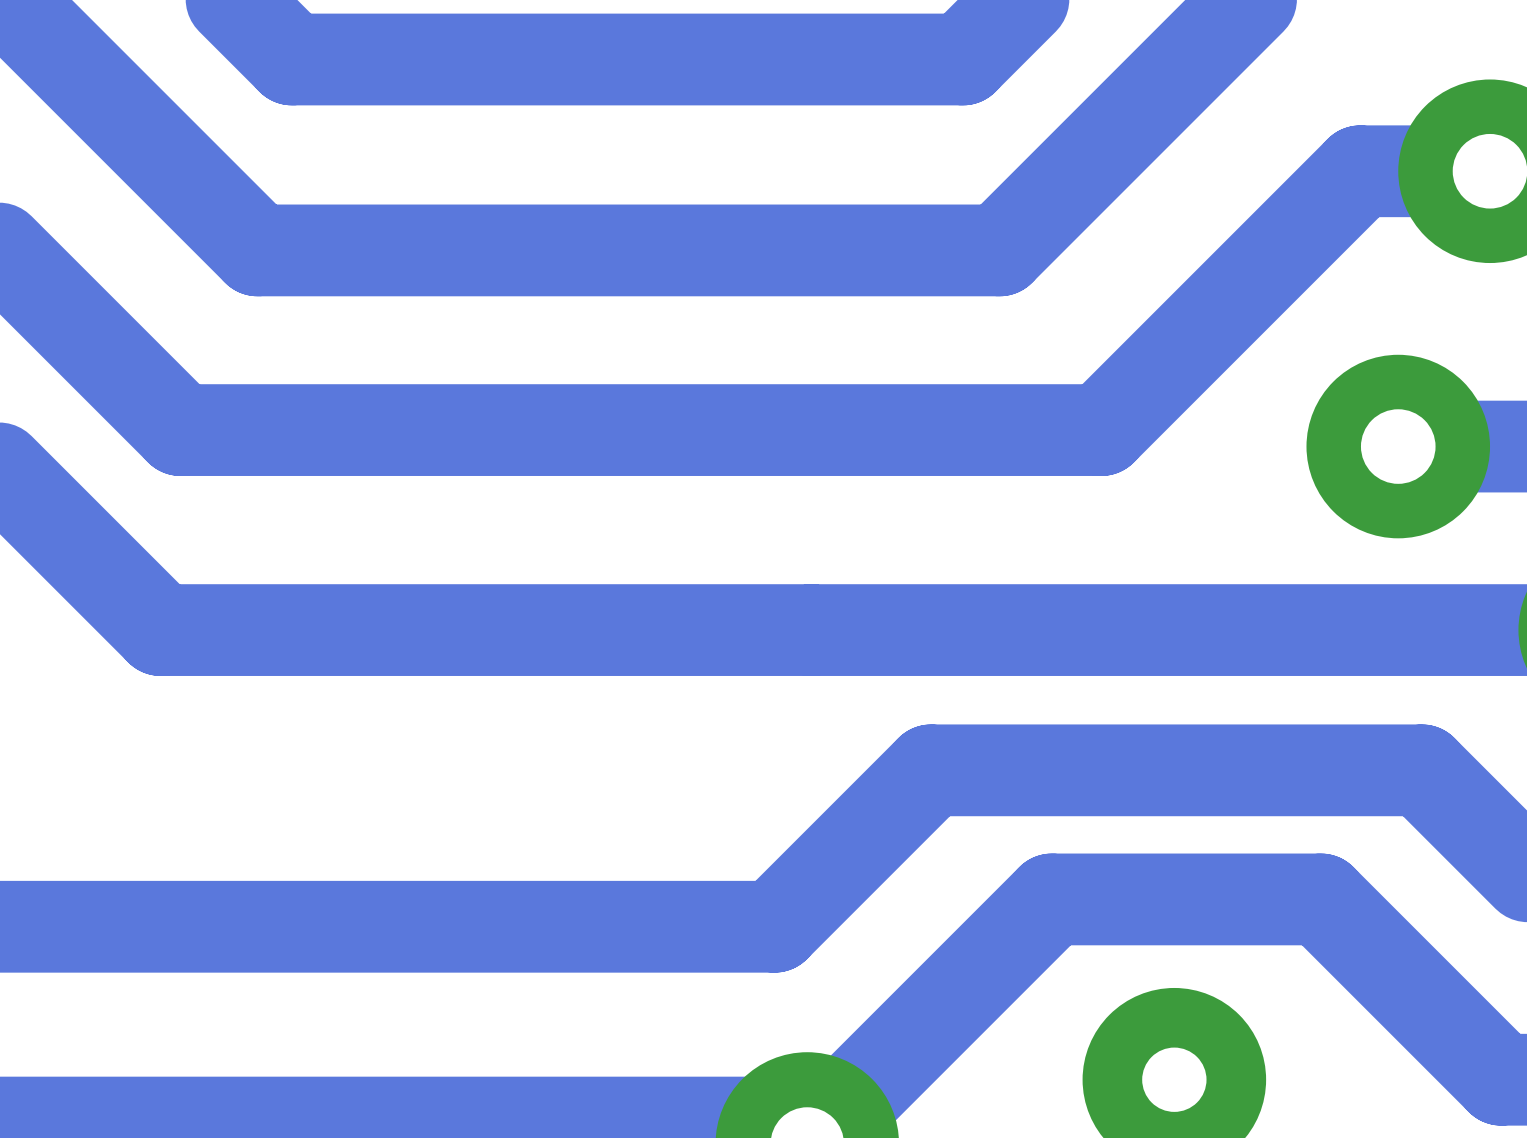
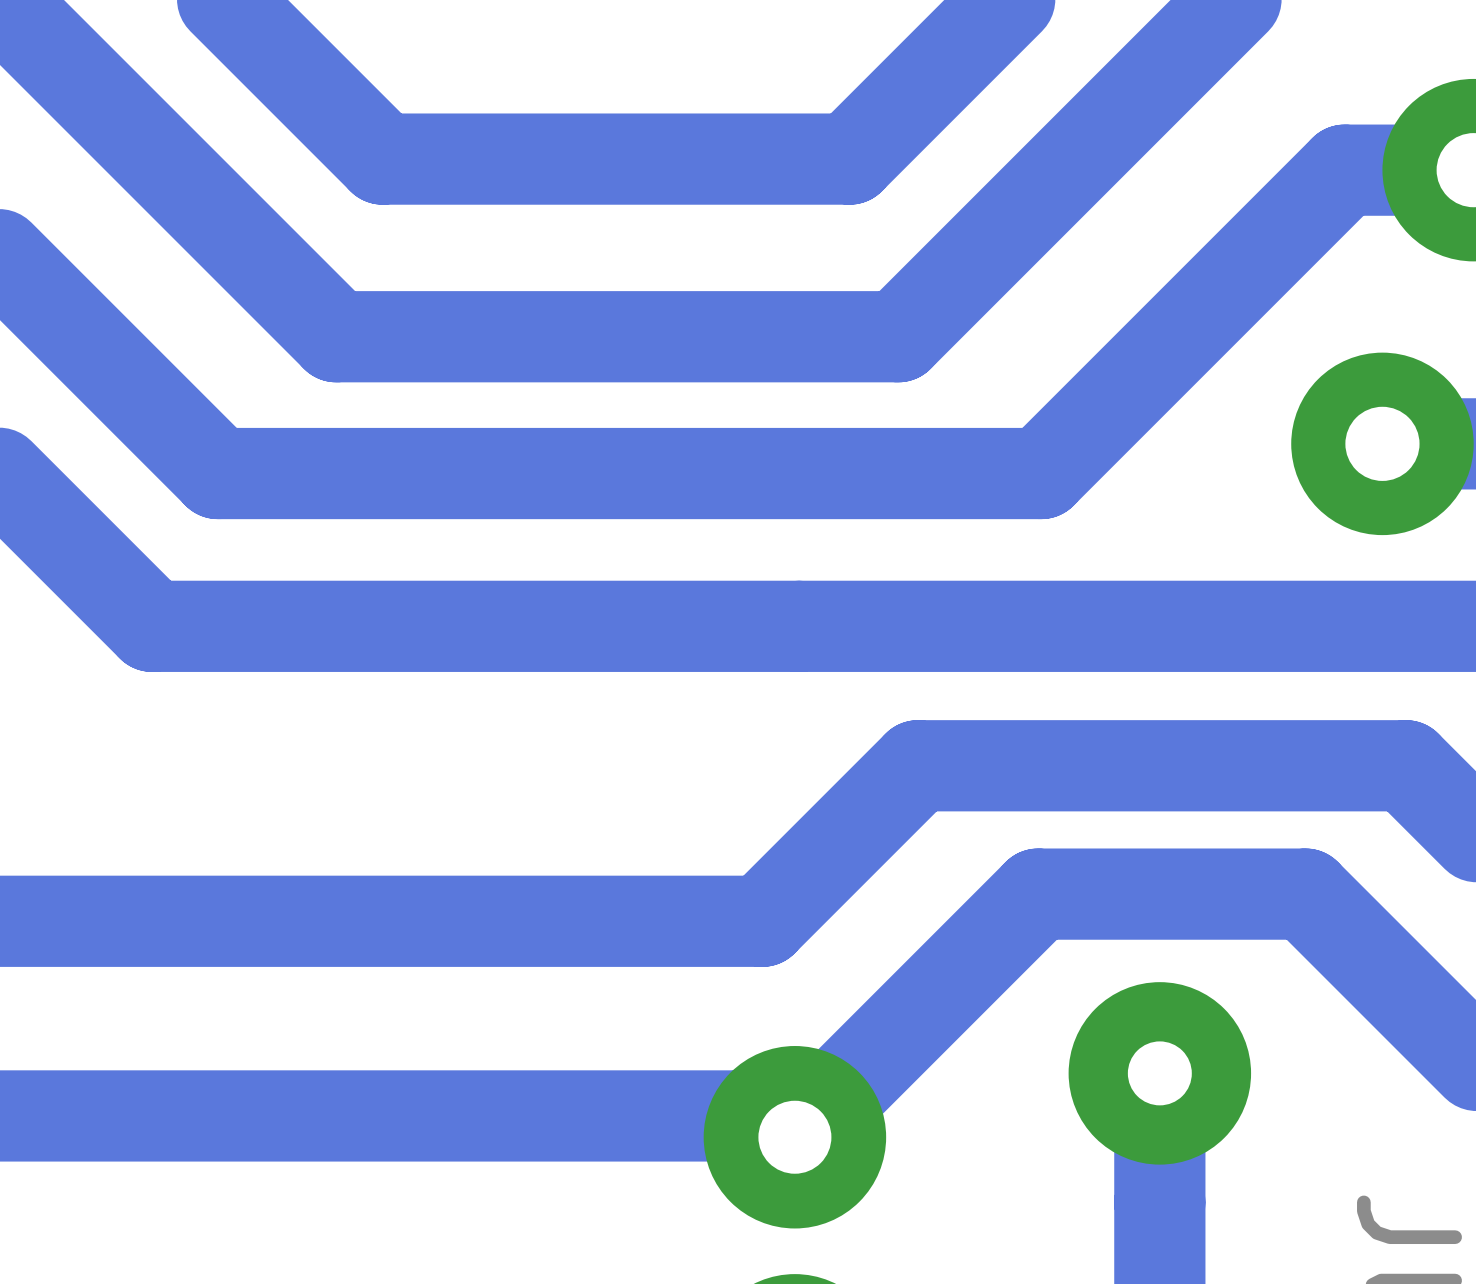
bottom track: (963, 59) (292, 59) -> (949, 59) (849, 159) (382, 159) (282, 59)
bottom track: (999, 250) (257, 250) -> (986, 248) (898, 336) (336, 336) (248, 248)
bottom track: (1101, 430) (180, 430) -> (1087, 427) (1041, 473) (217, 473) (171, 427)

